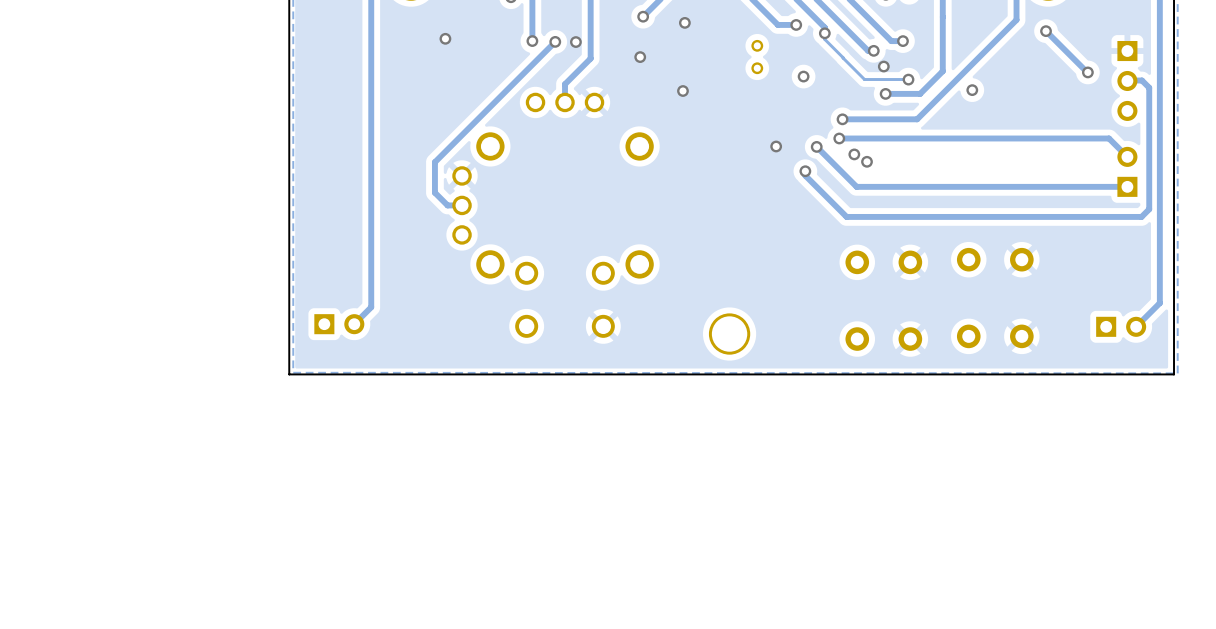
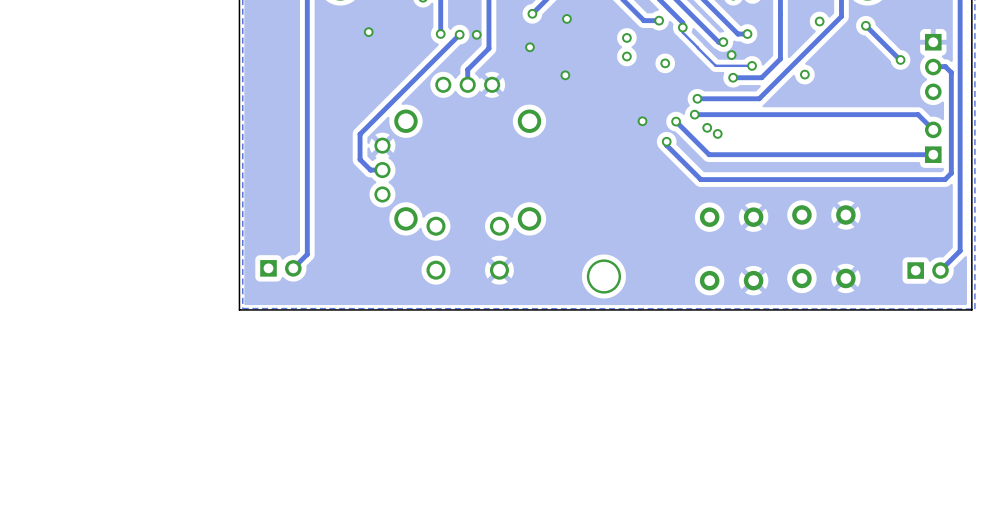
via: none -> (819, 21)

